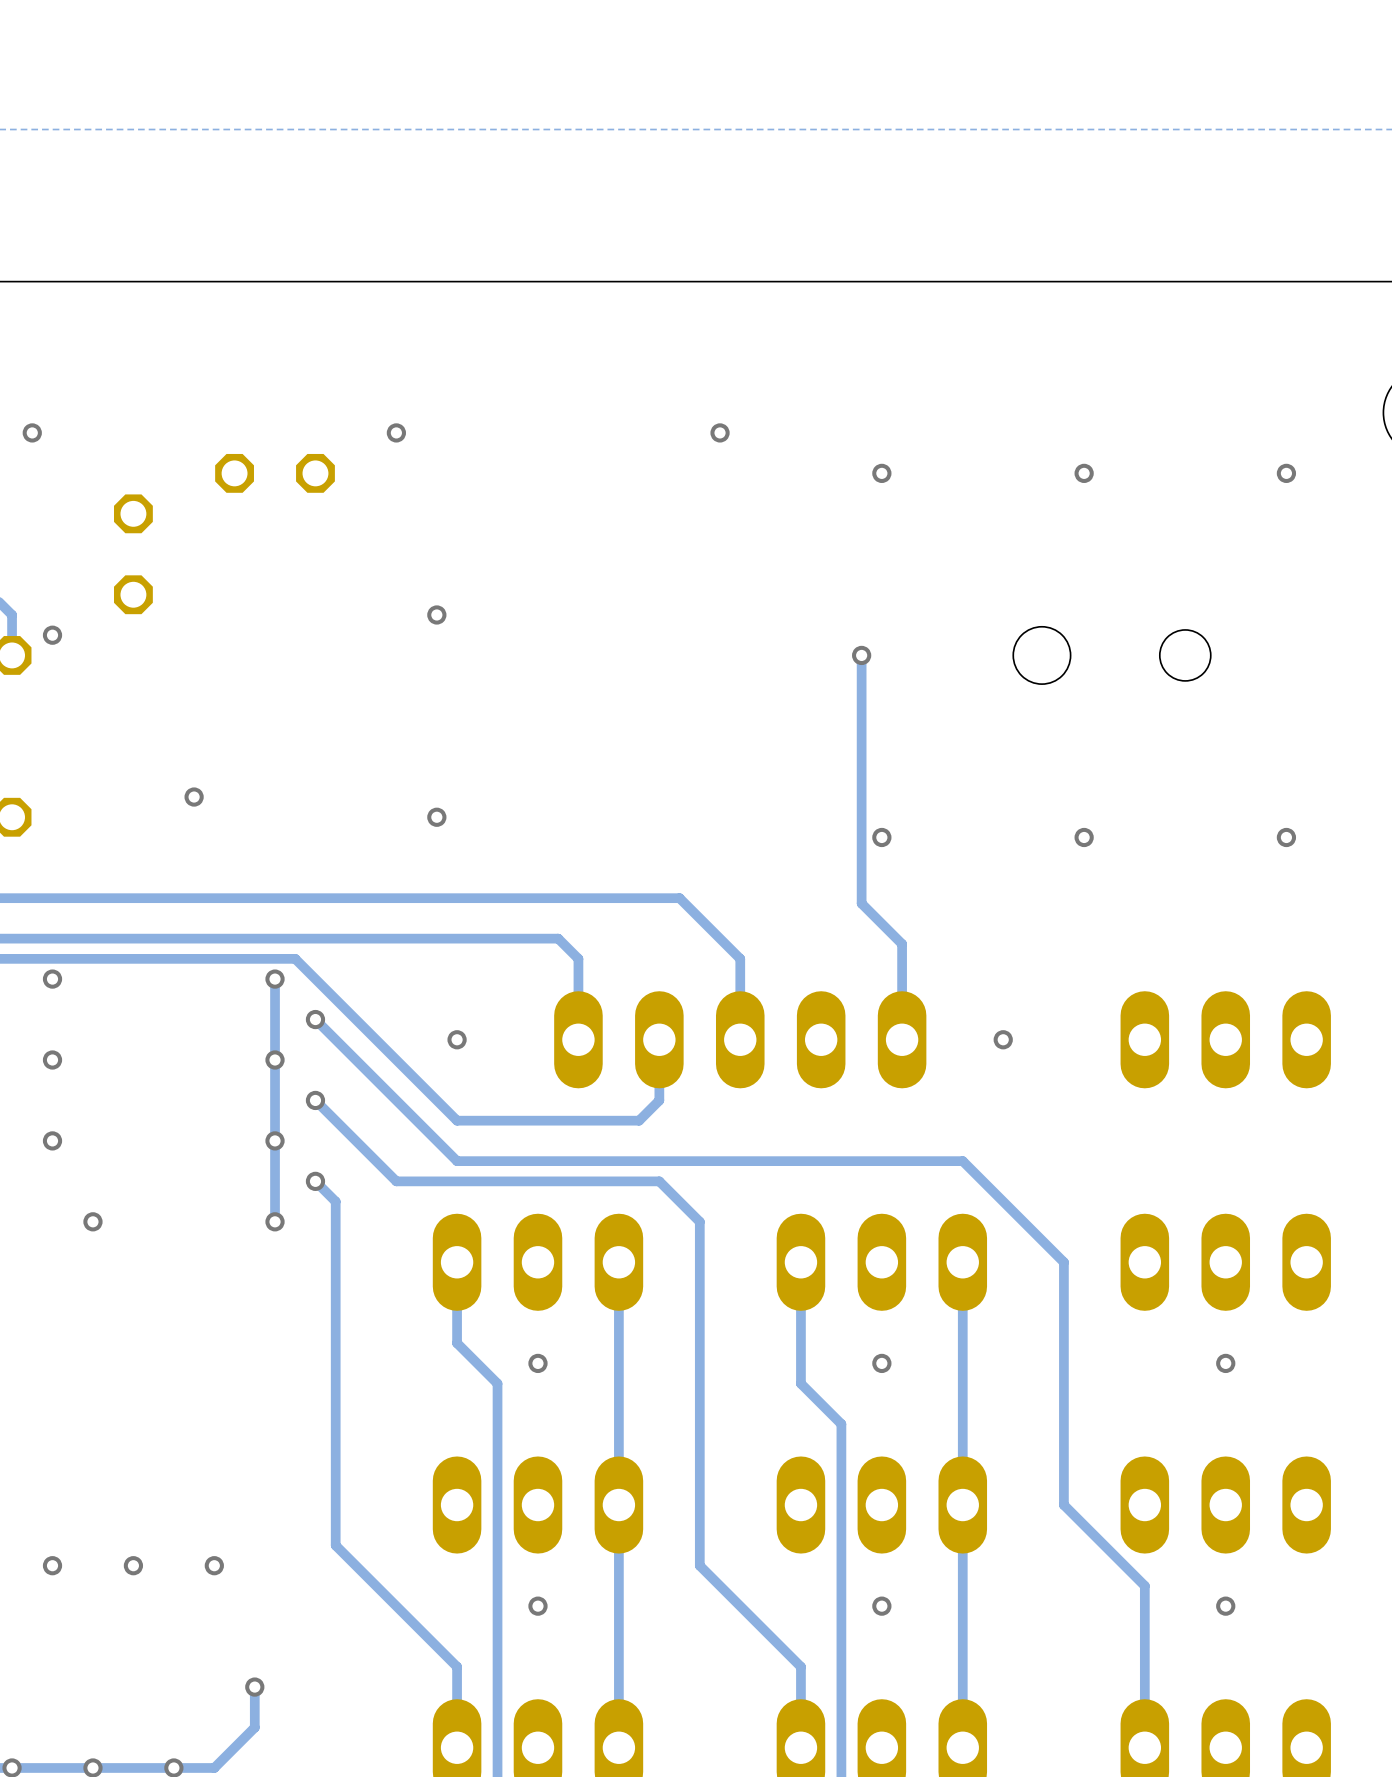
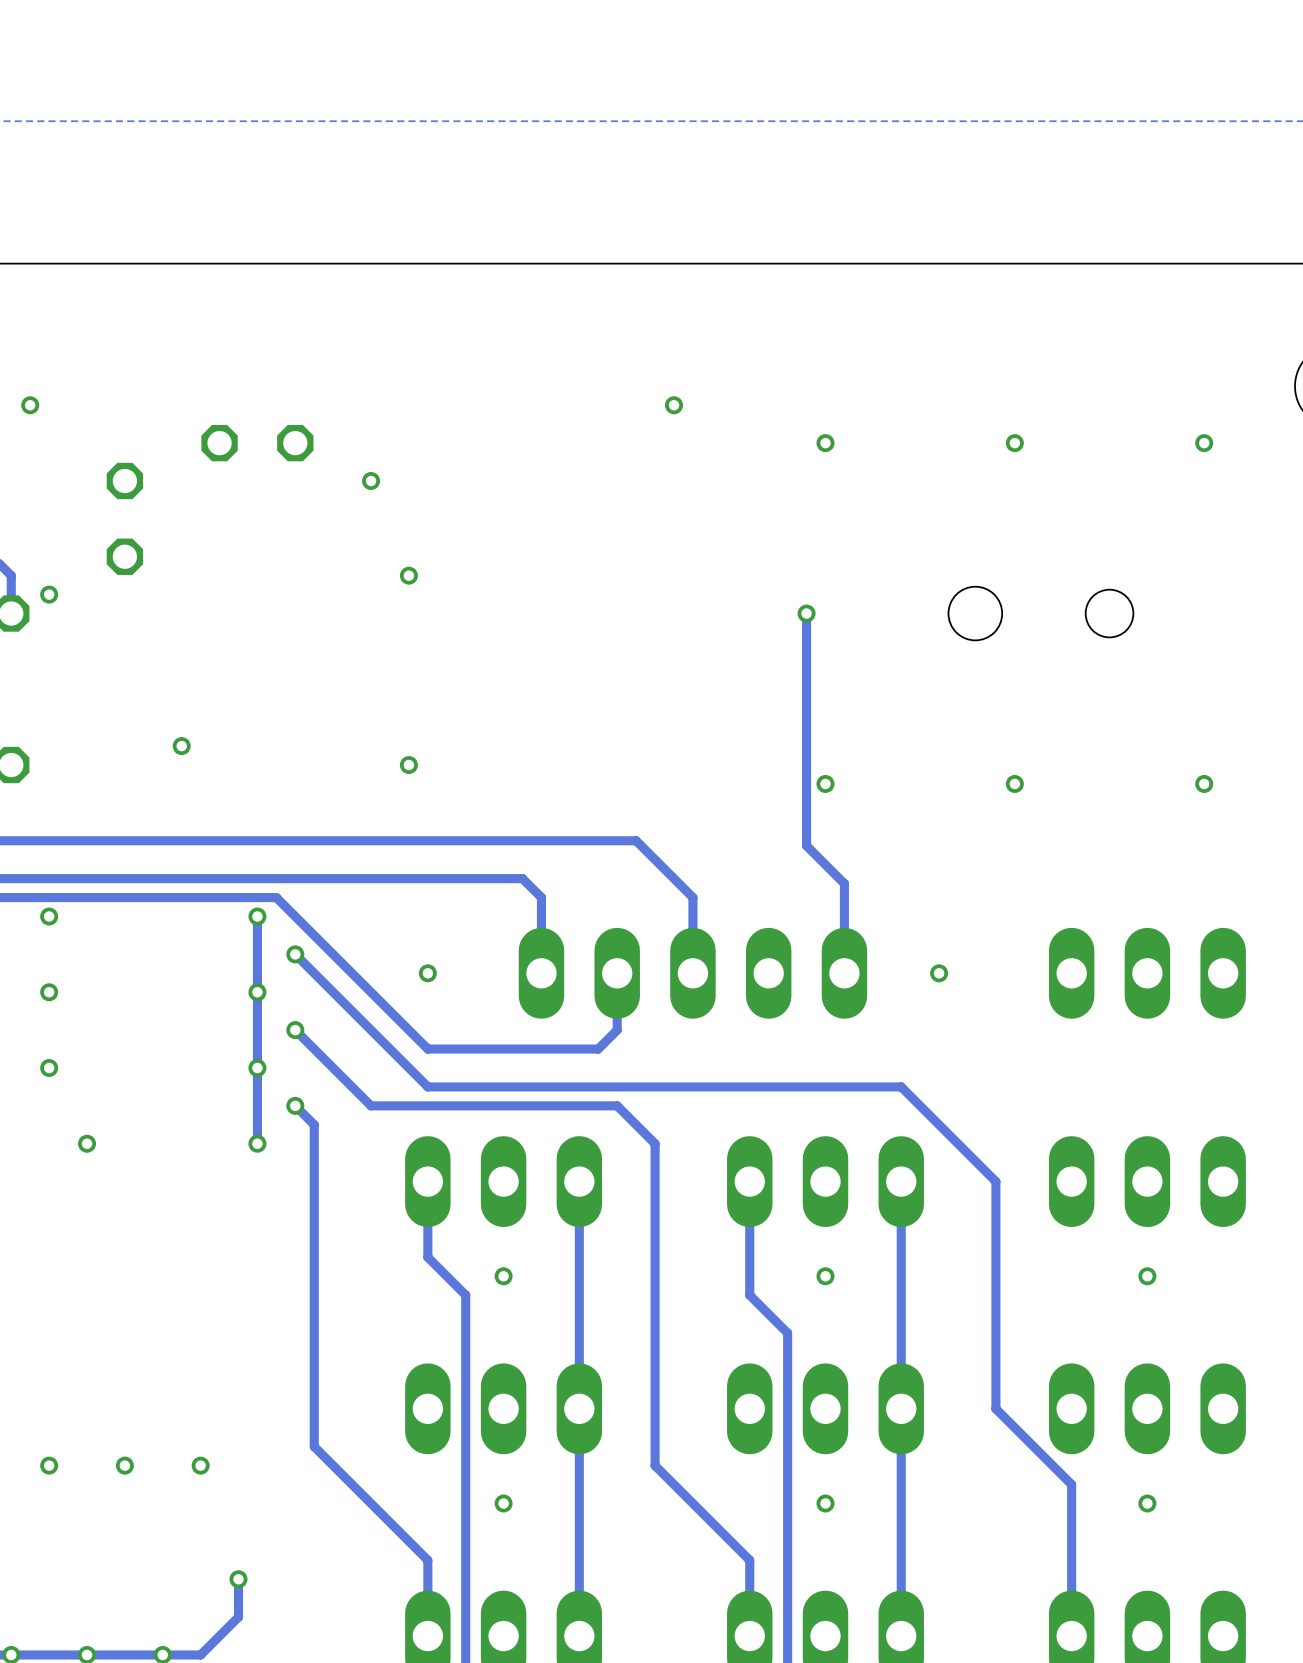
via position: (396, 432) -> (371, 481)

